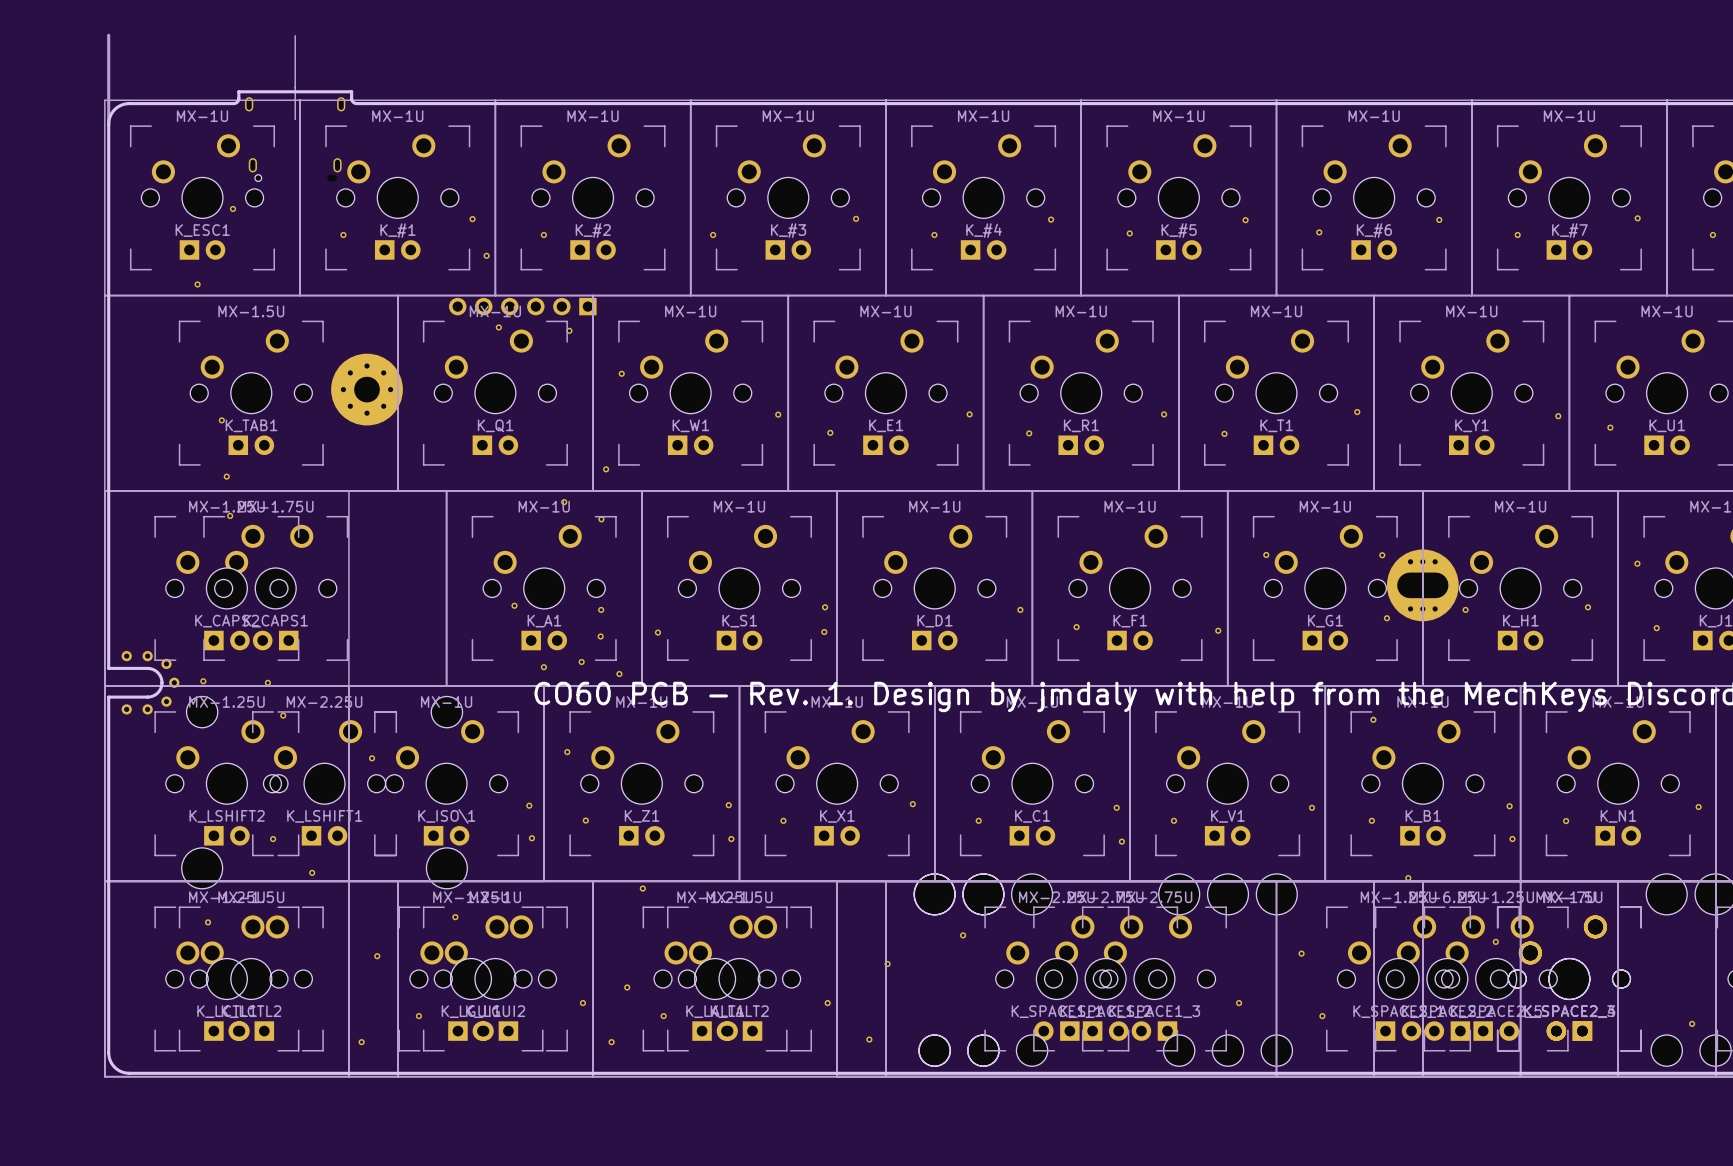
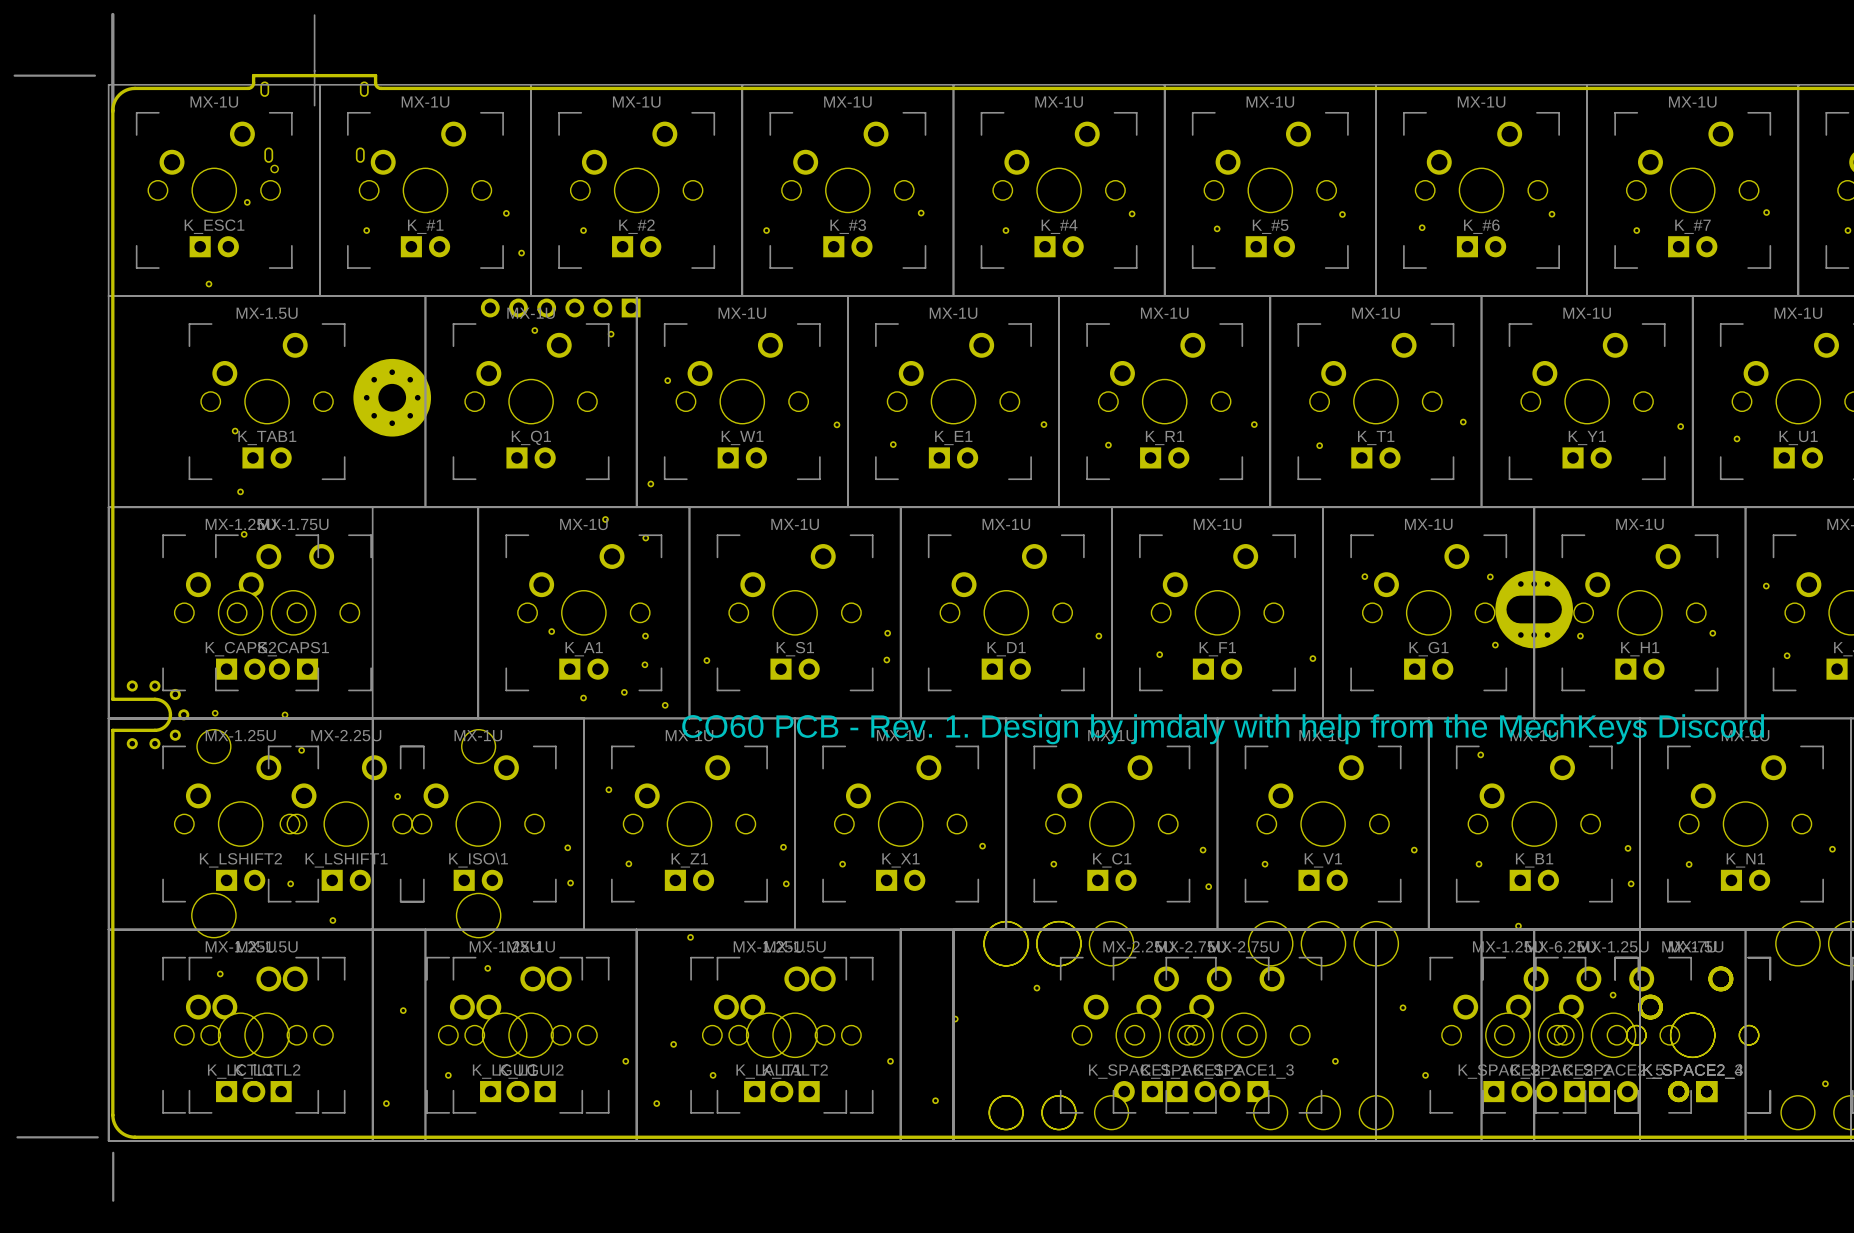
line: none -> (14, 75) (94, 75)
line: none -> (17, 1137) (97, 1137)
line: none -> (113, 1152) (113, 1200)

